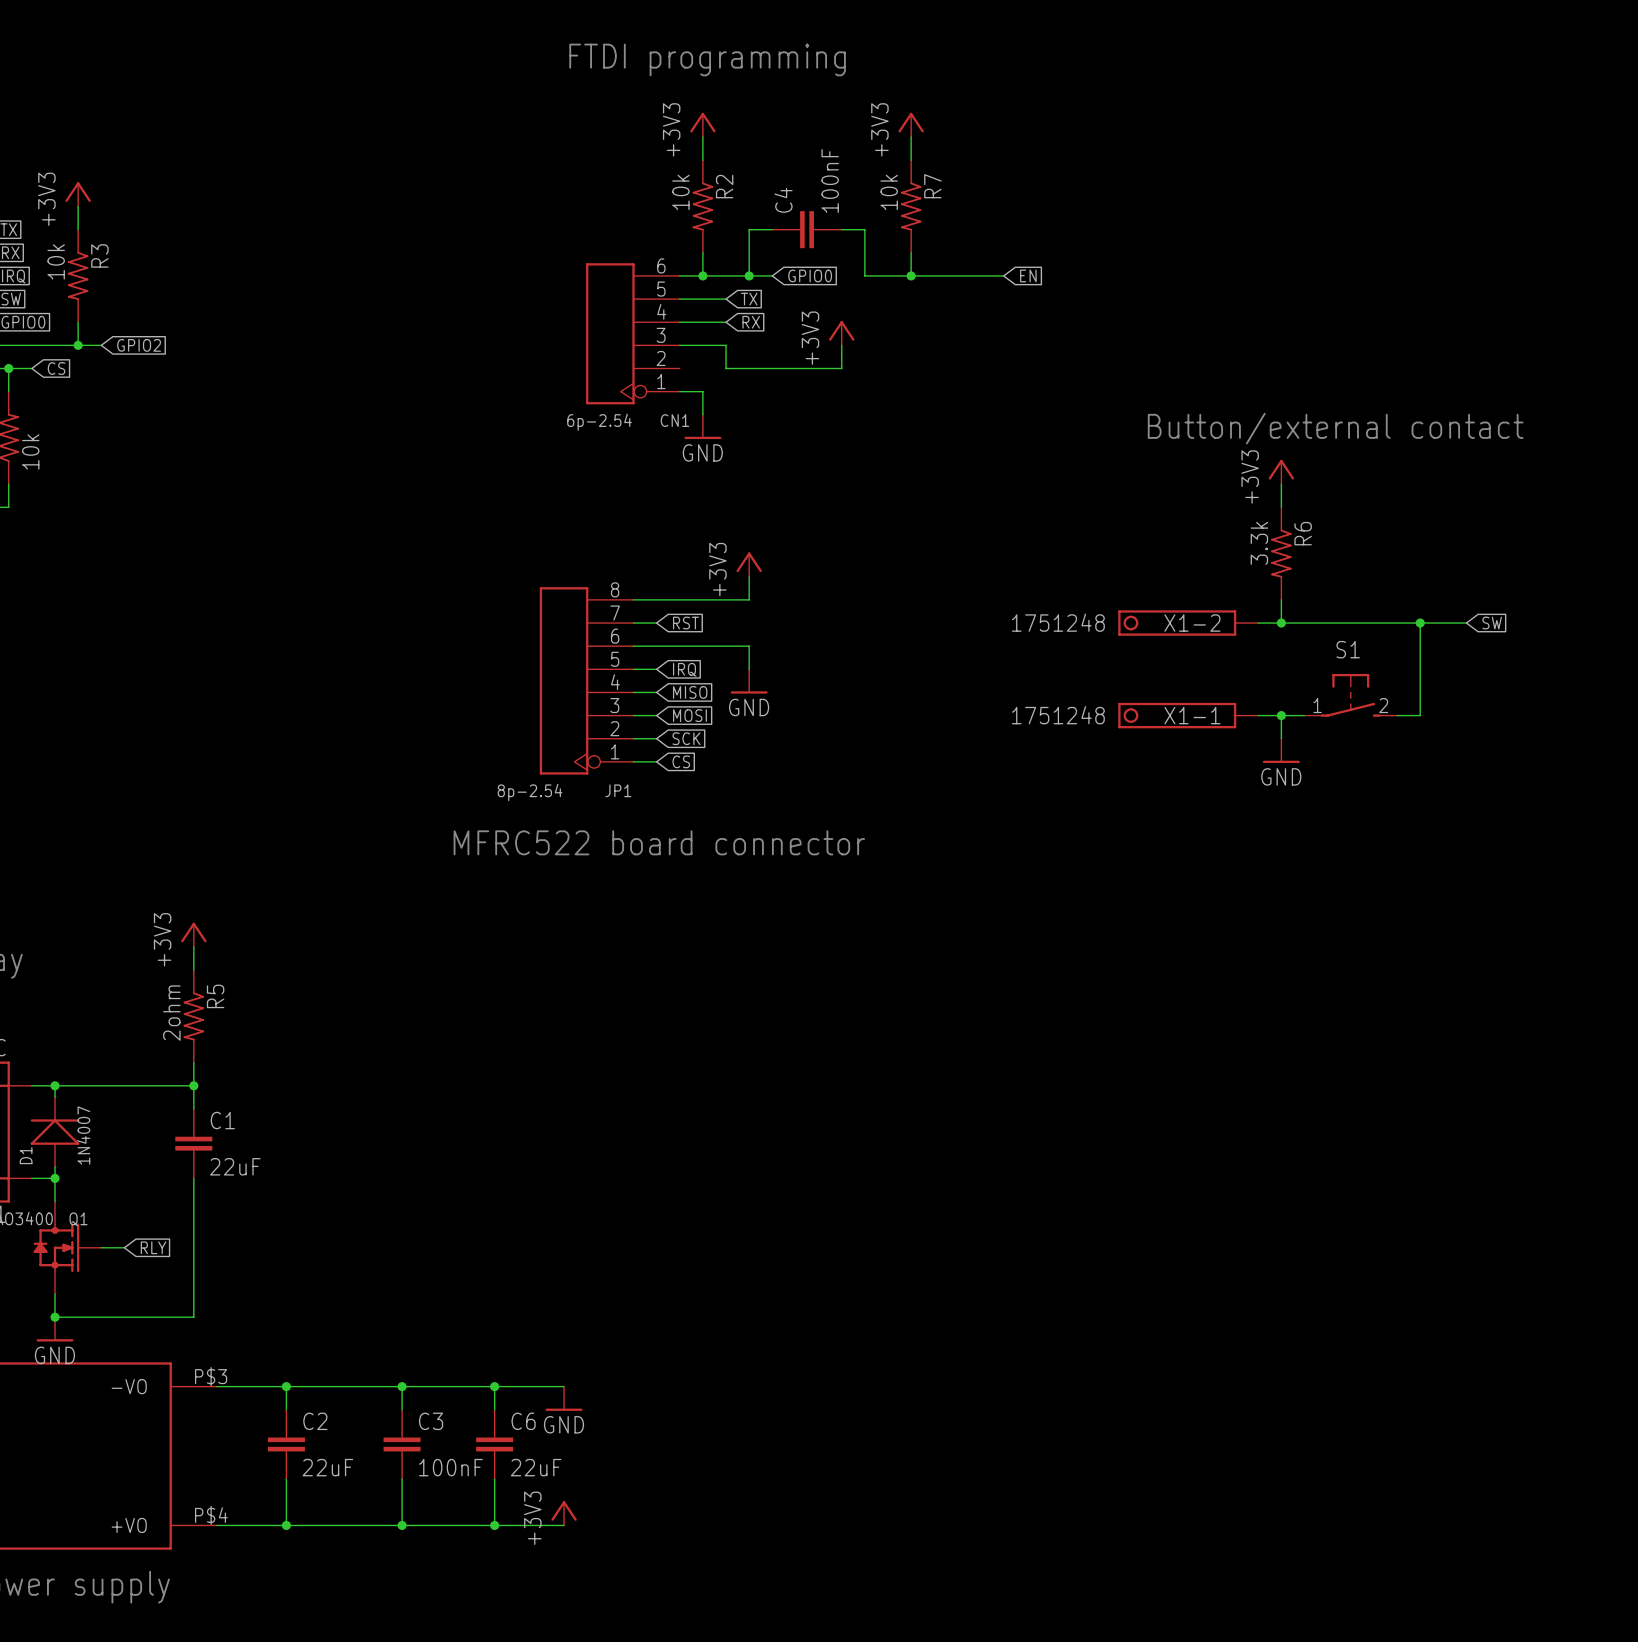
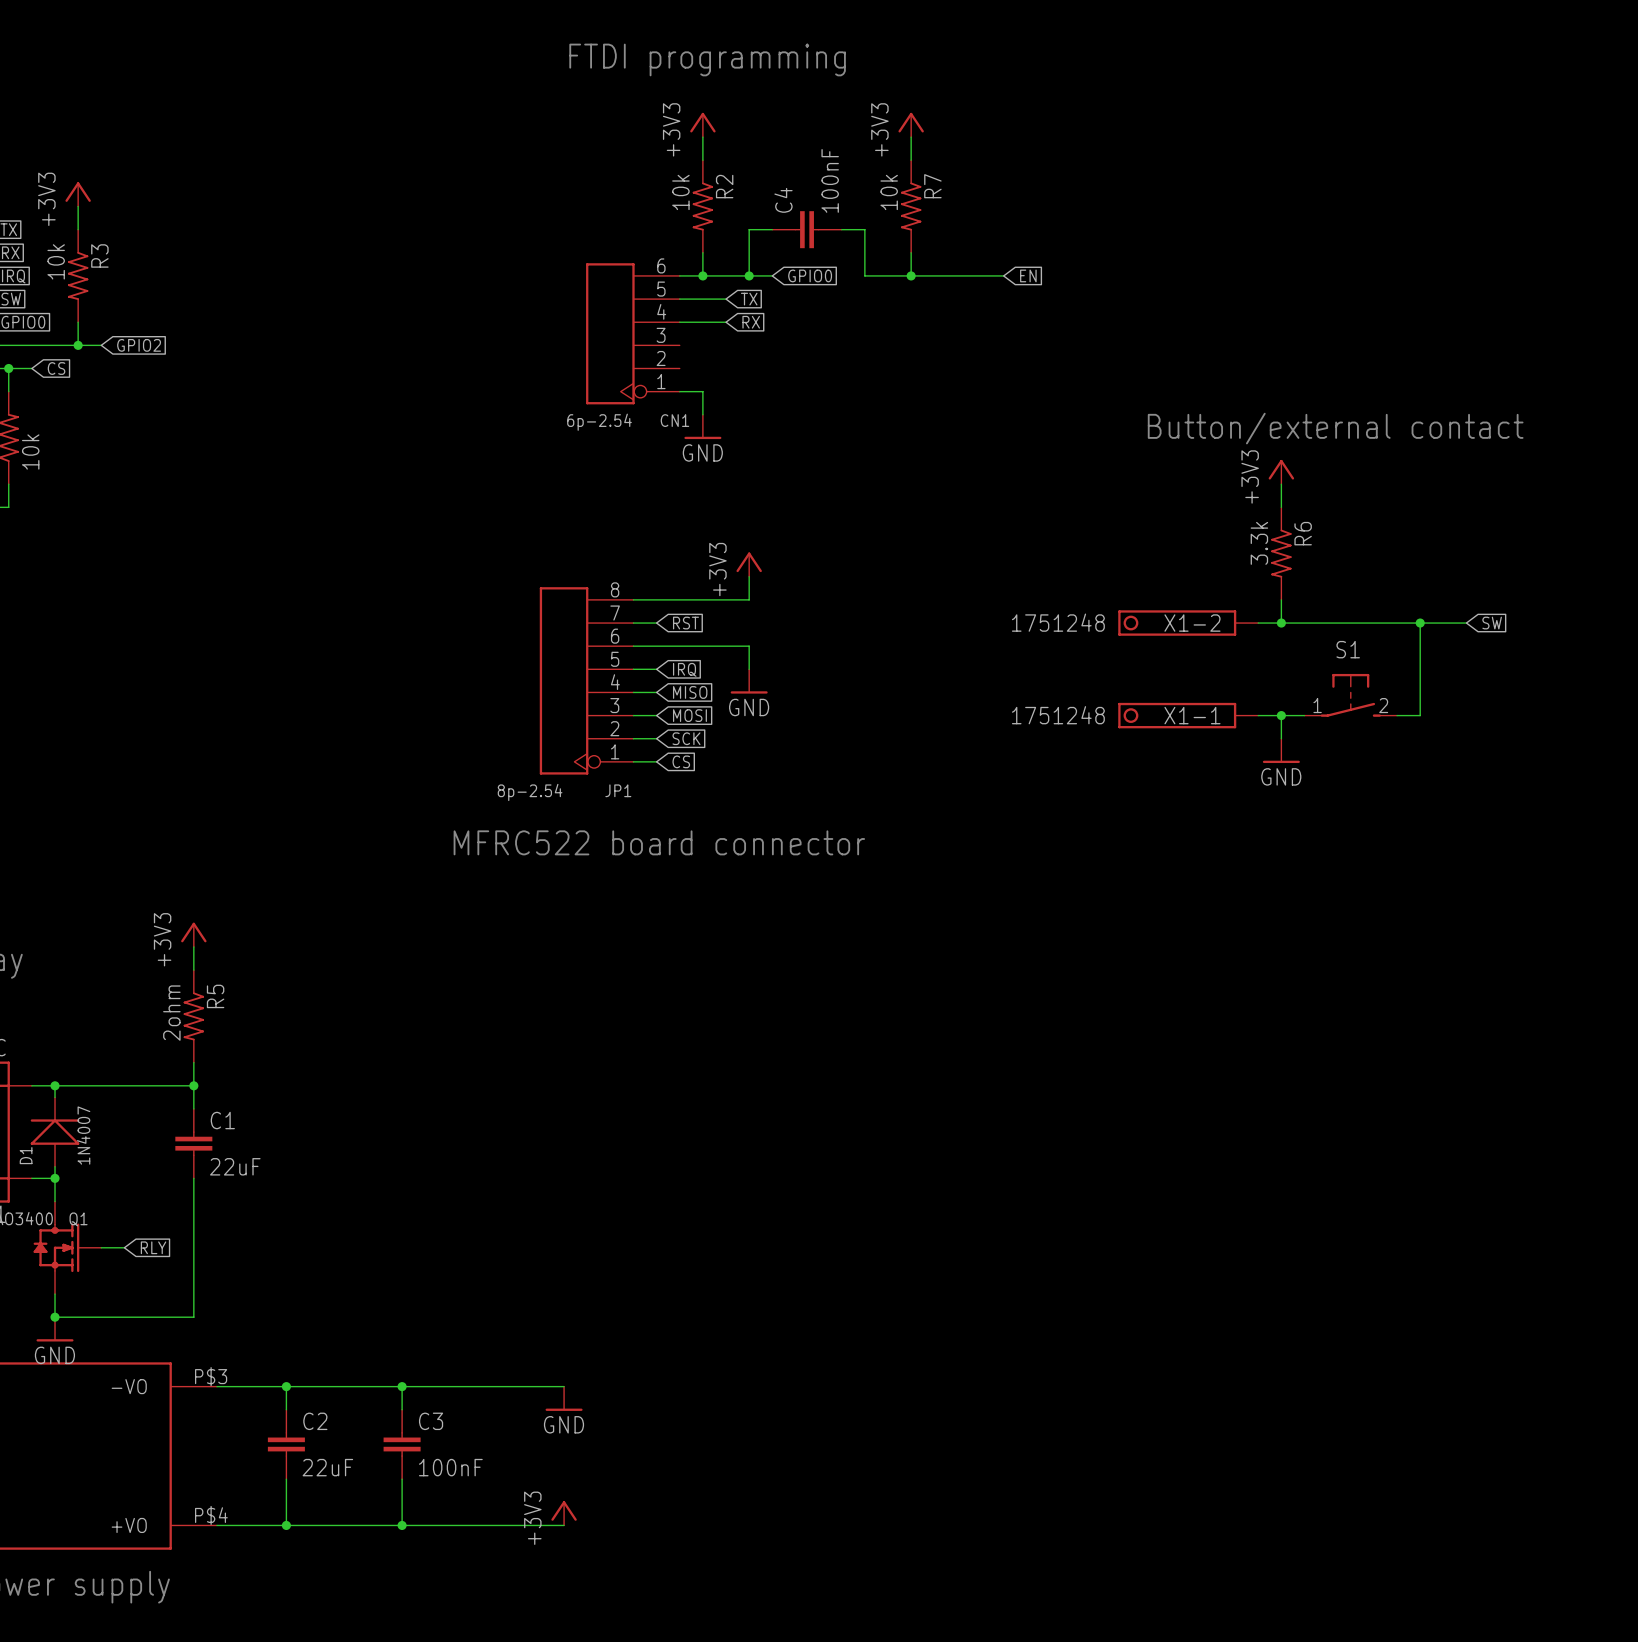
power symbol: +3V3 (841, 333) -> none
wire: (679, 345) (726, 345) (726, 368) (841, 368) (841, 345) -> none
wire: (494, 1386) (494, 1409) -> none
junction: (494, 1386) -> none
C6: 22uF (494, 1444) -> none
wire: (494, 1479) (494, 1525) -> none
junction: (494, 1525) -> none

